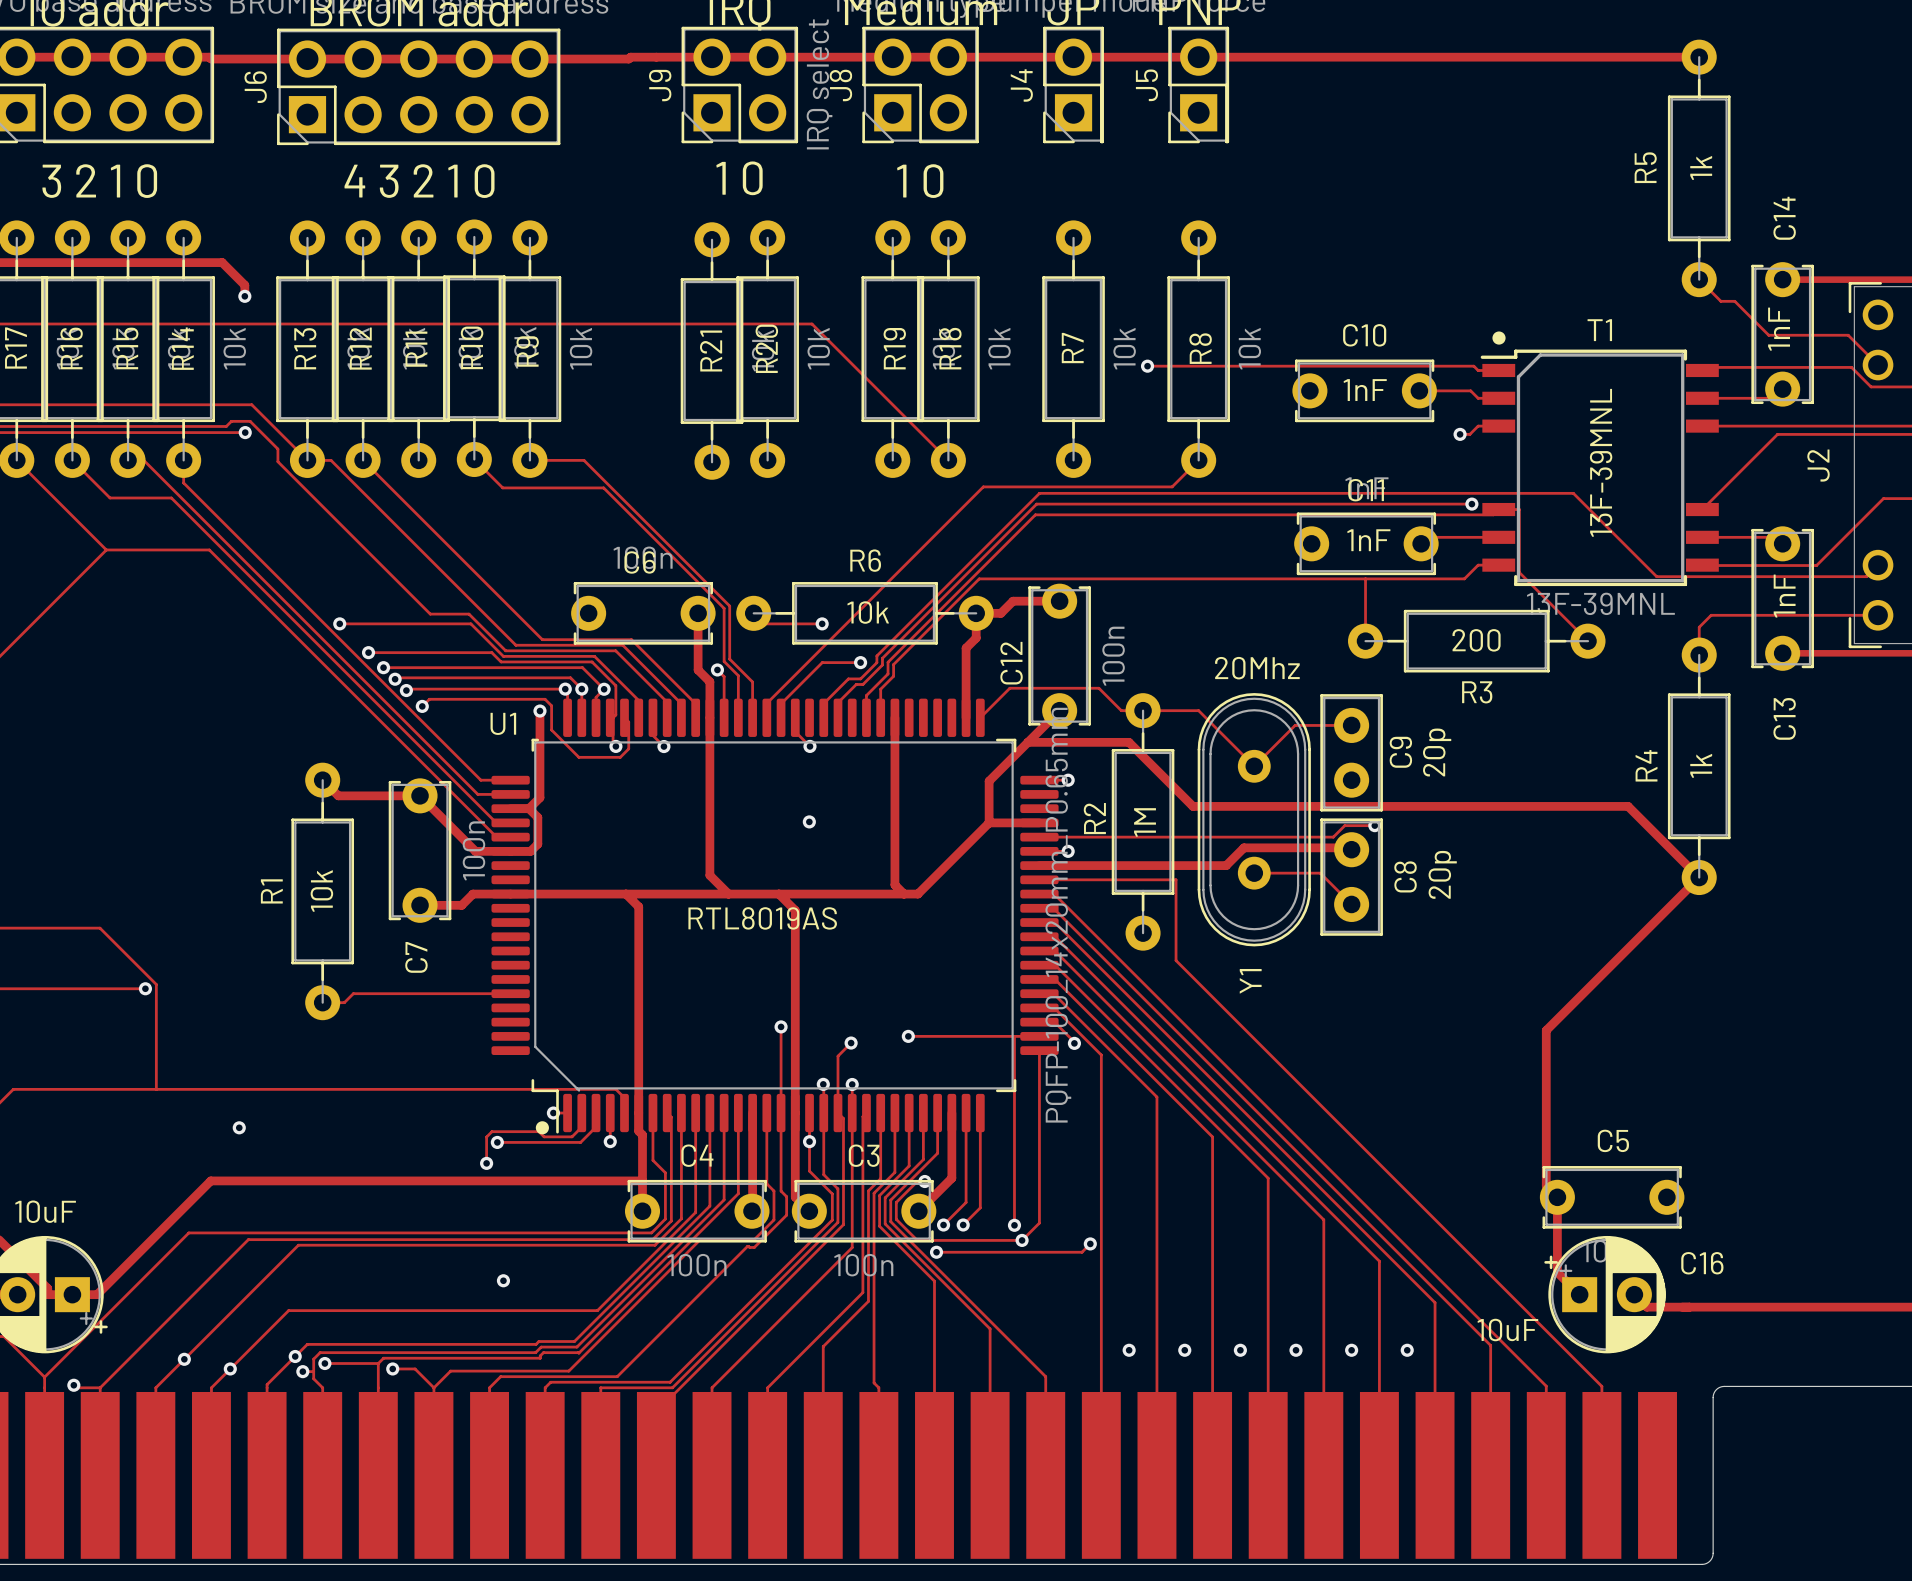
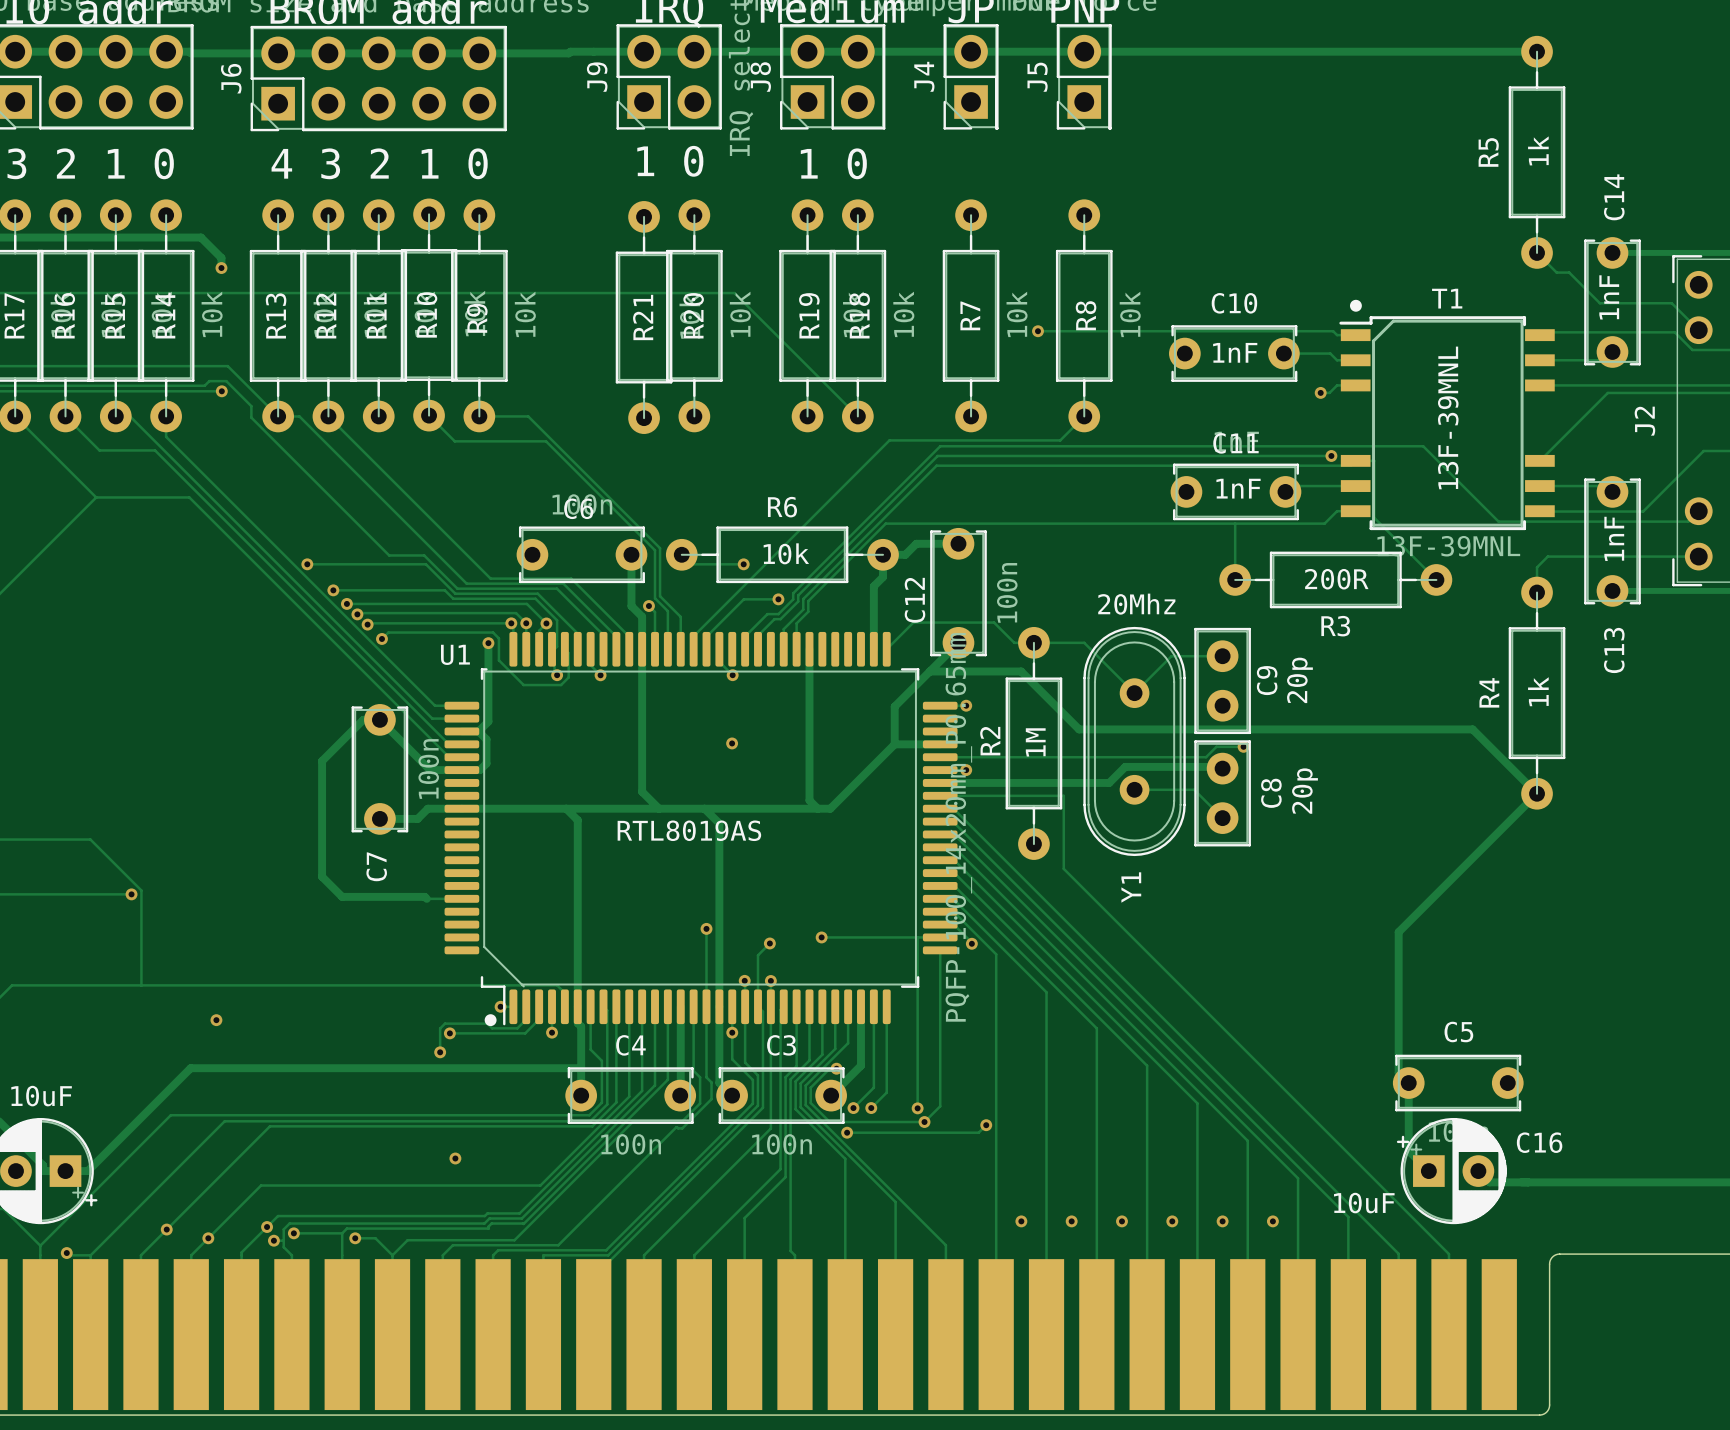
R3 value: 200 (1476, 640) -> 200R (1336, 579)
track: (322, 780) (338, 795) (401, 795) -> none
R1: 10k (322, 891) -> none
track: (471, 993) (353, 993) (344, 1002) (322, 1002) -> (426, 898) (424, 896) (342, 896) (322, 876) (322, 761) (363, 719)

